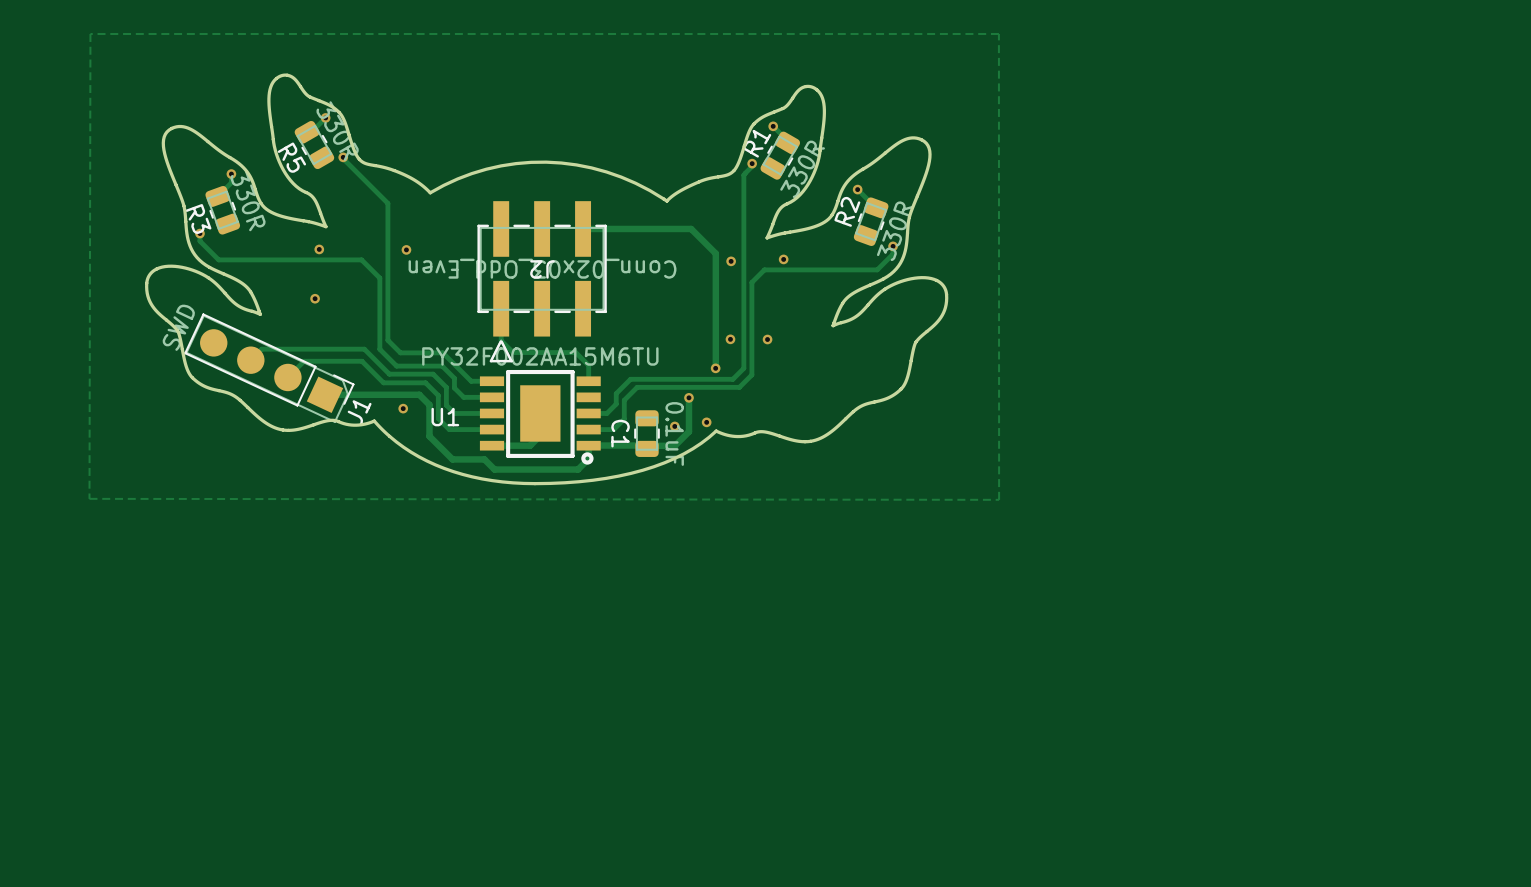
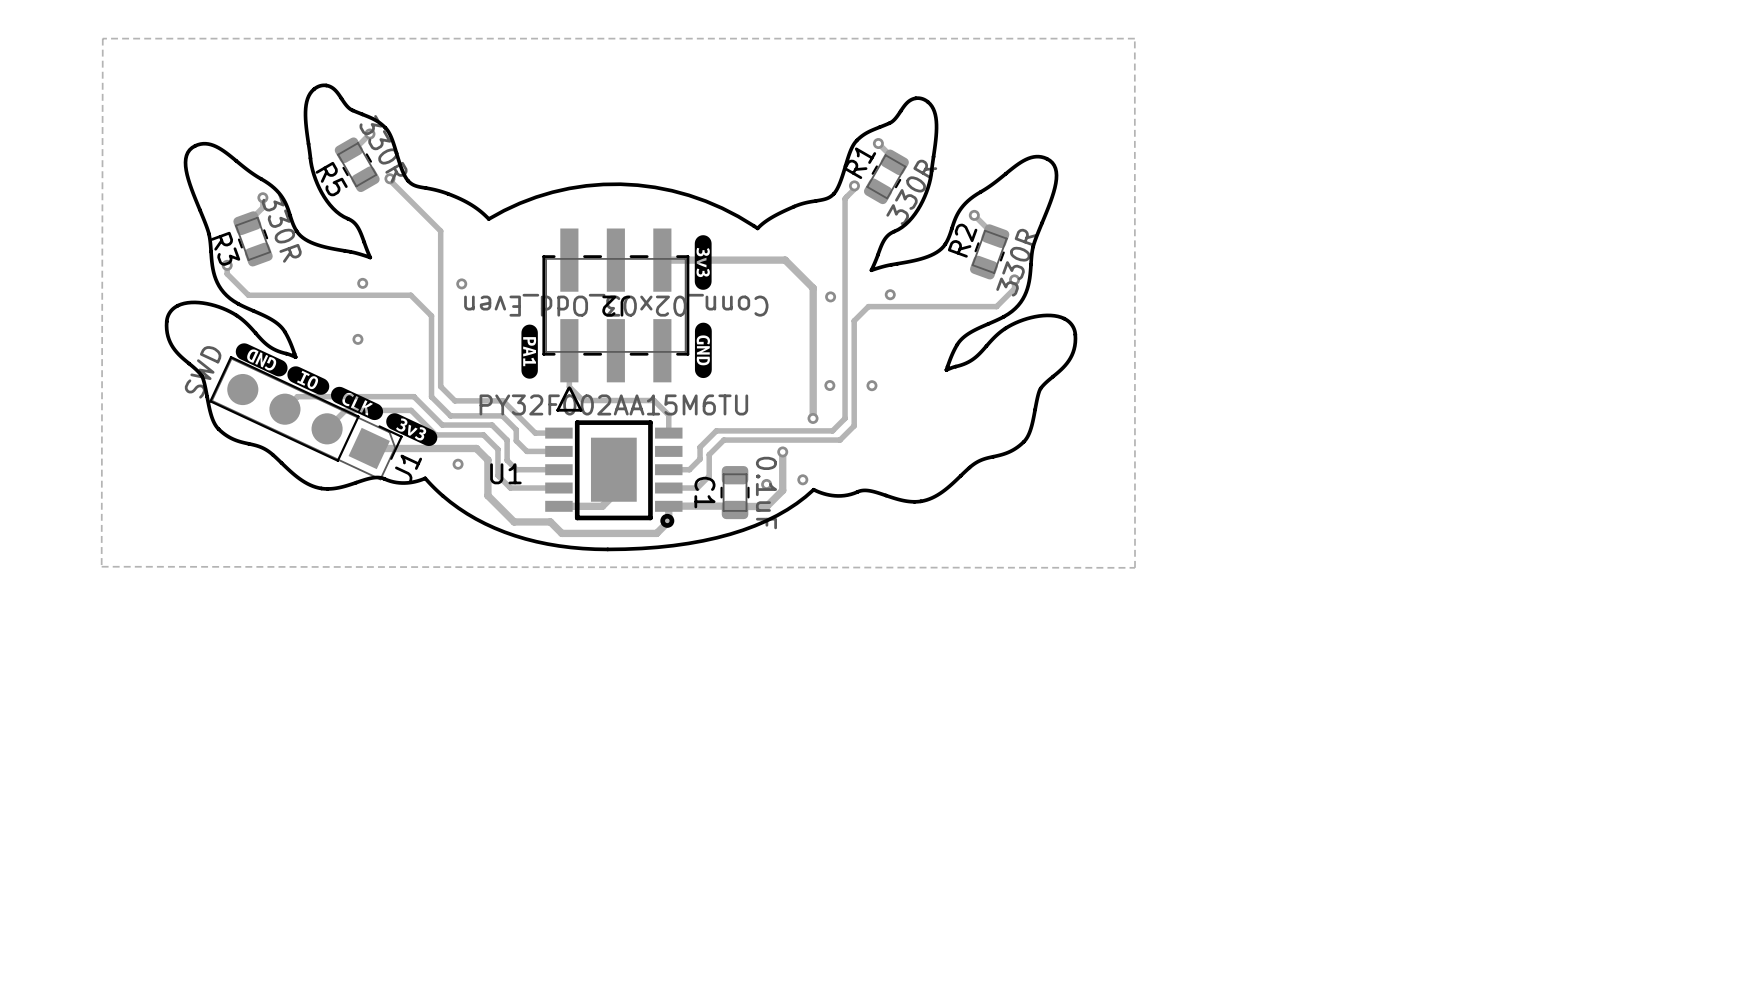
drawing: none -> [694, 235, 712, 290]
drawing: none -> [694, 322, 712, 379]
drawing: none -> [521, 324, 538, 379]
drawing: none -> [235, 343, 438, 447]

